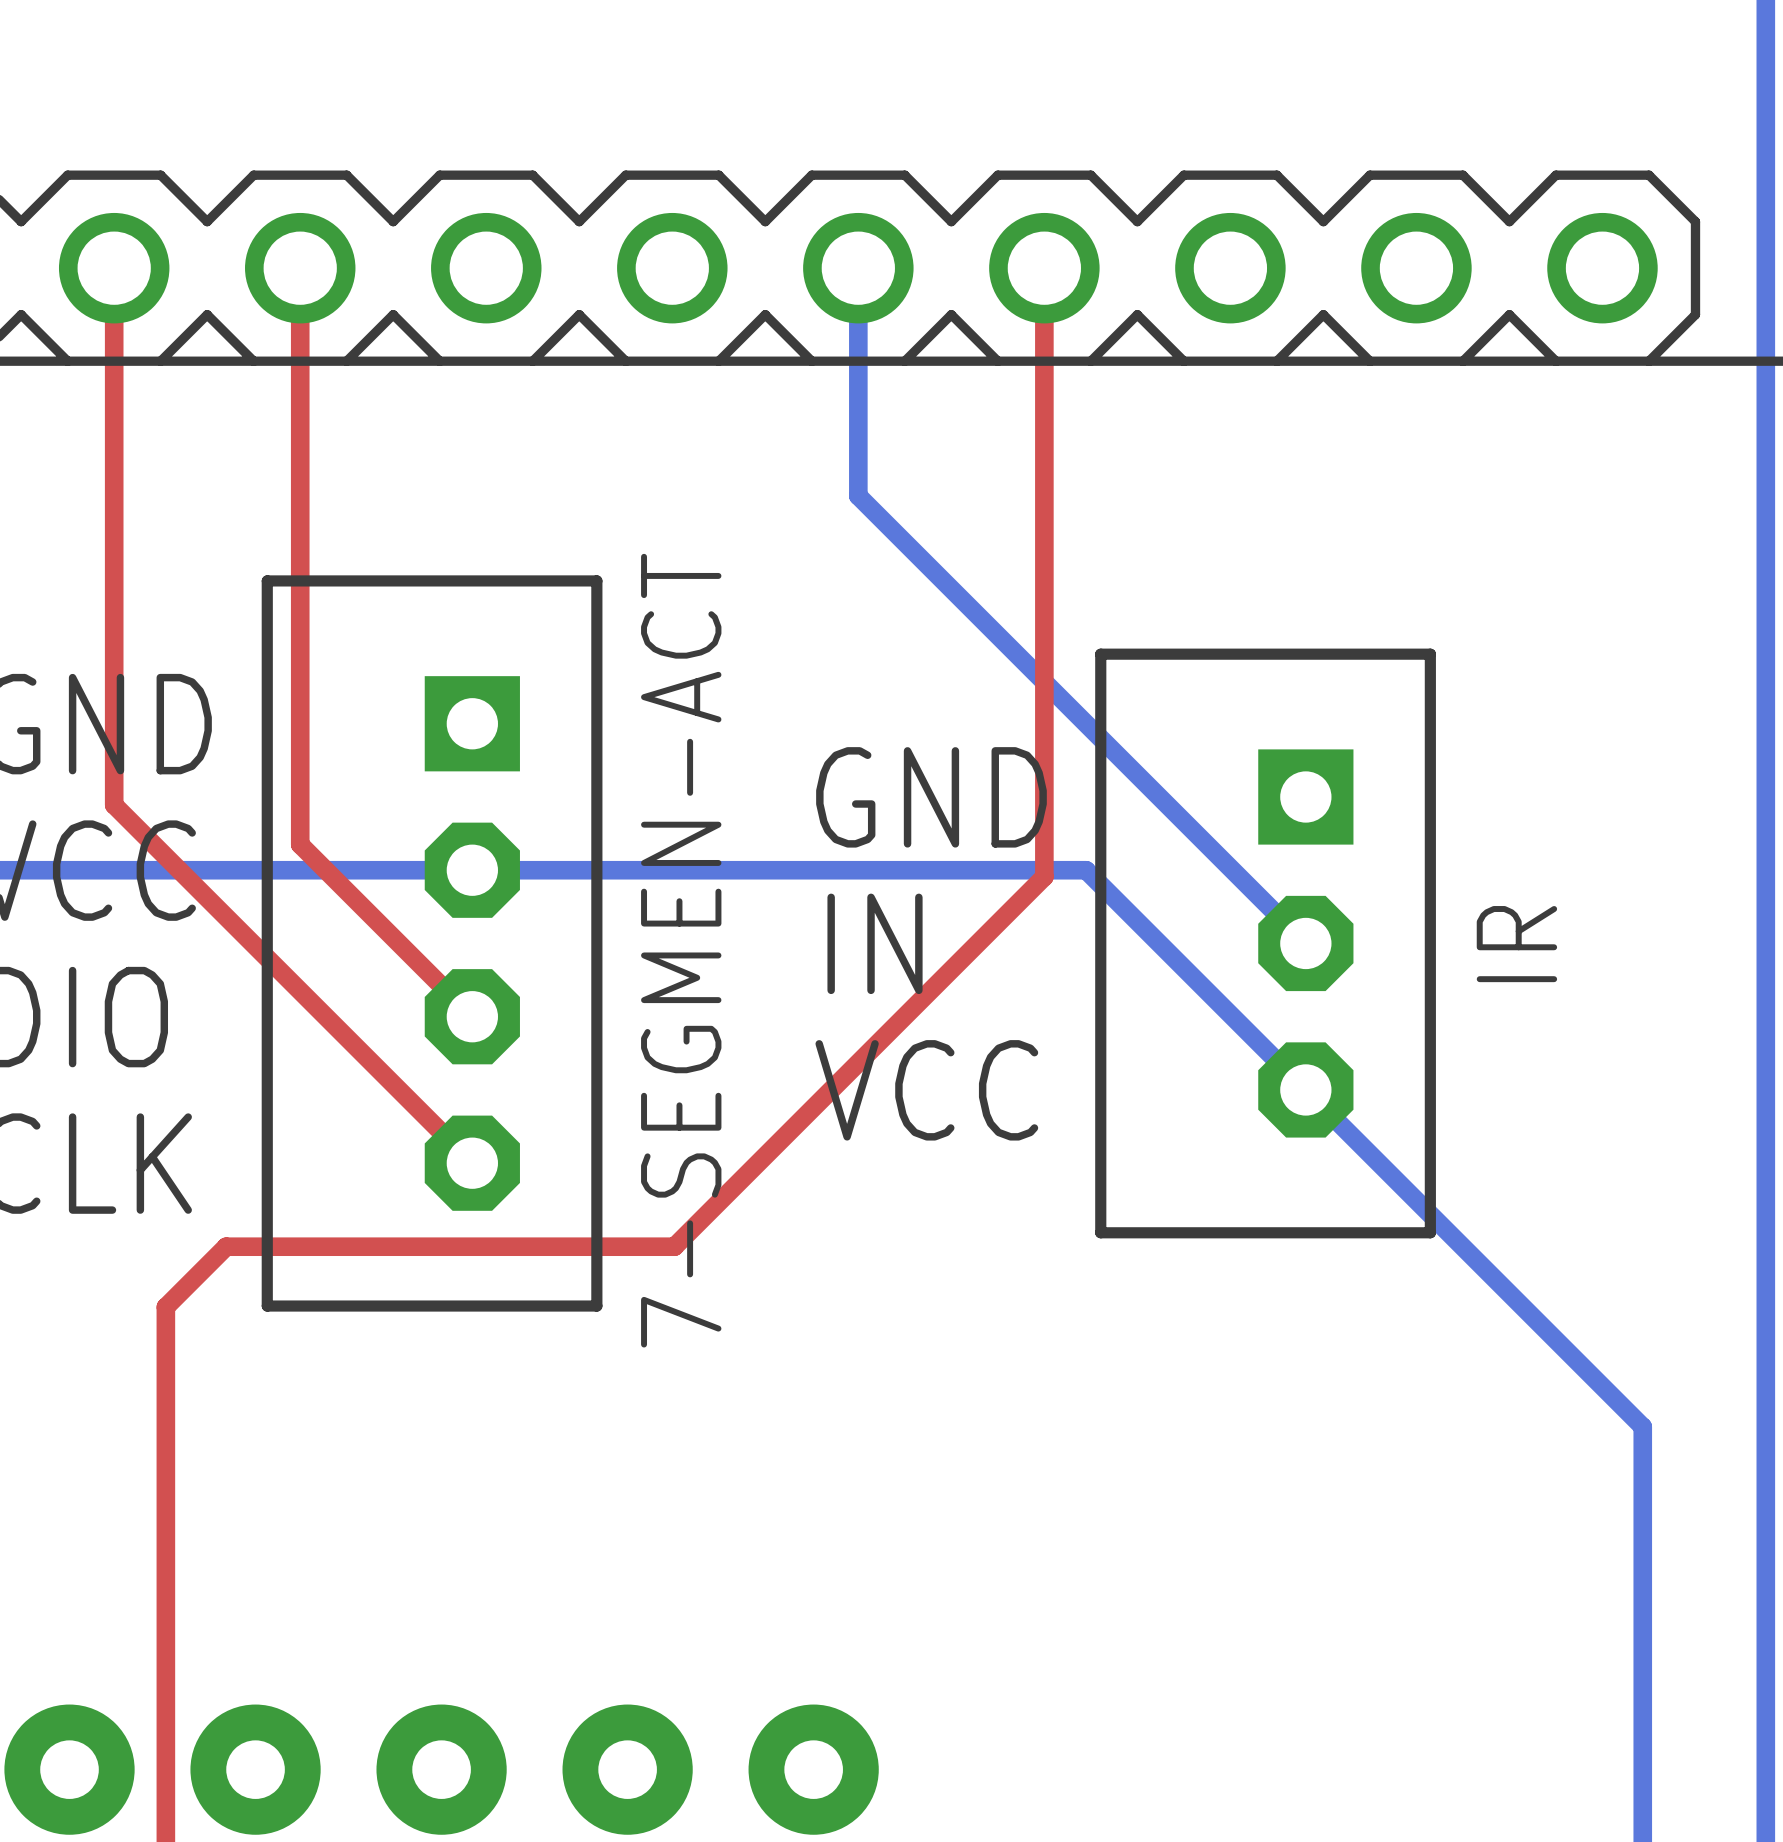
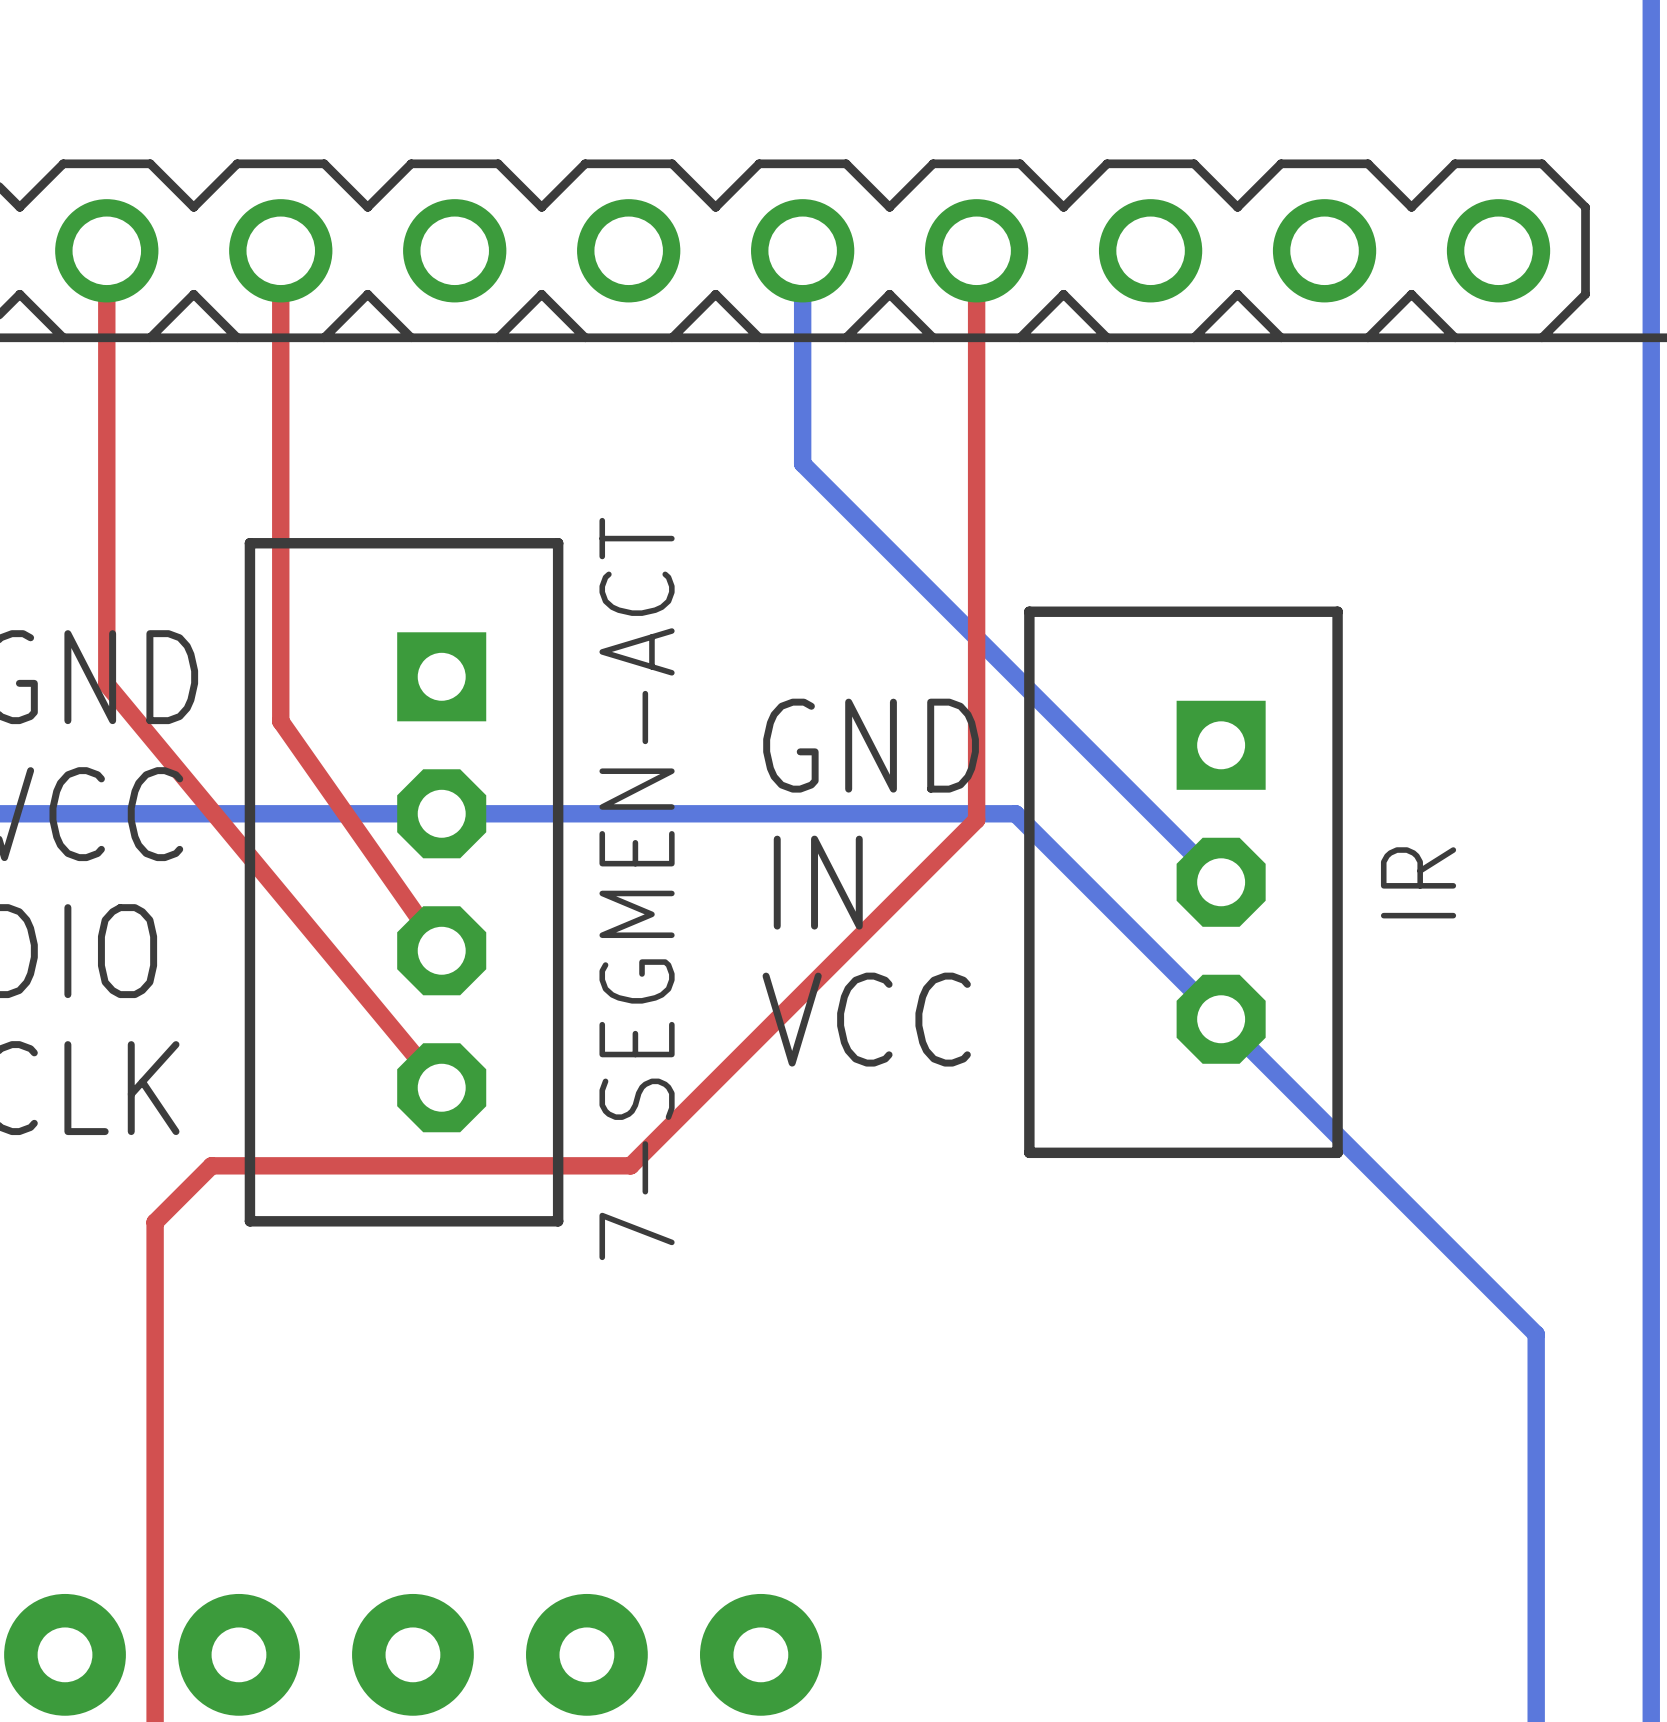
top track: (114, 731) (114, 805) (472, 1163) -> (106, 684) (441, 1087)
top track: (300, 771) (300, 844) (472, 1016) -> (280, 721) (441, 950)

